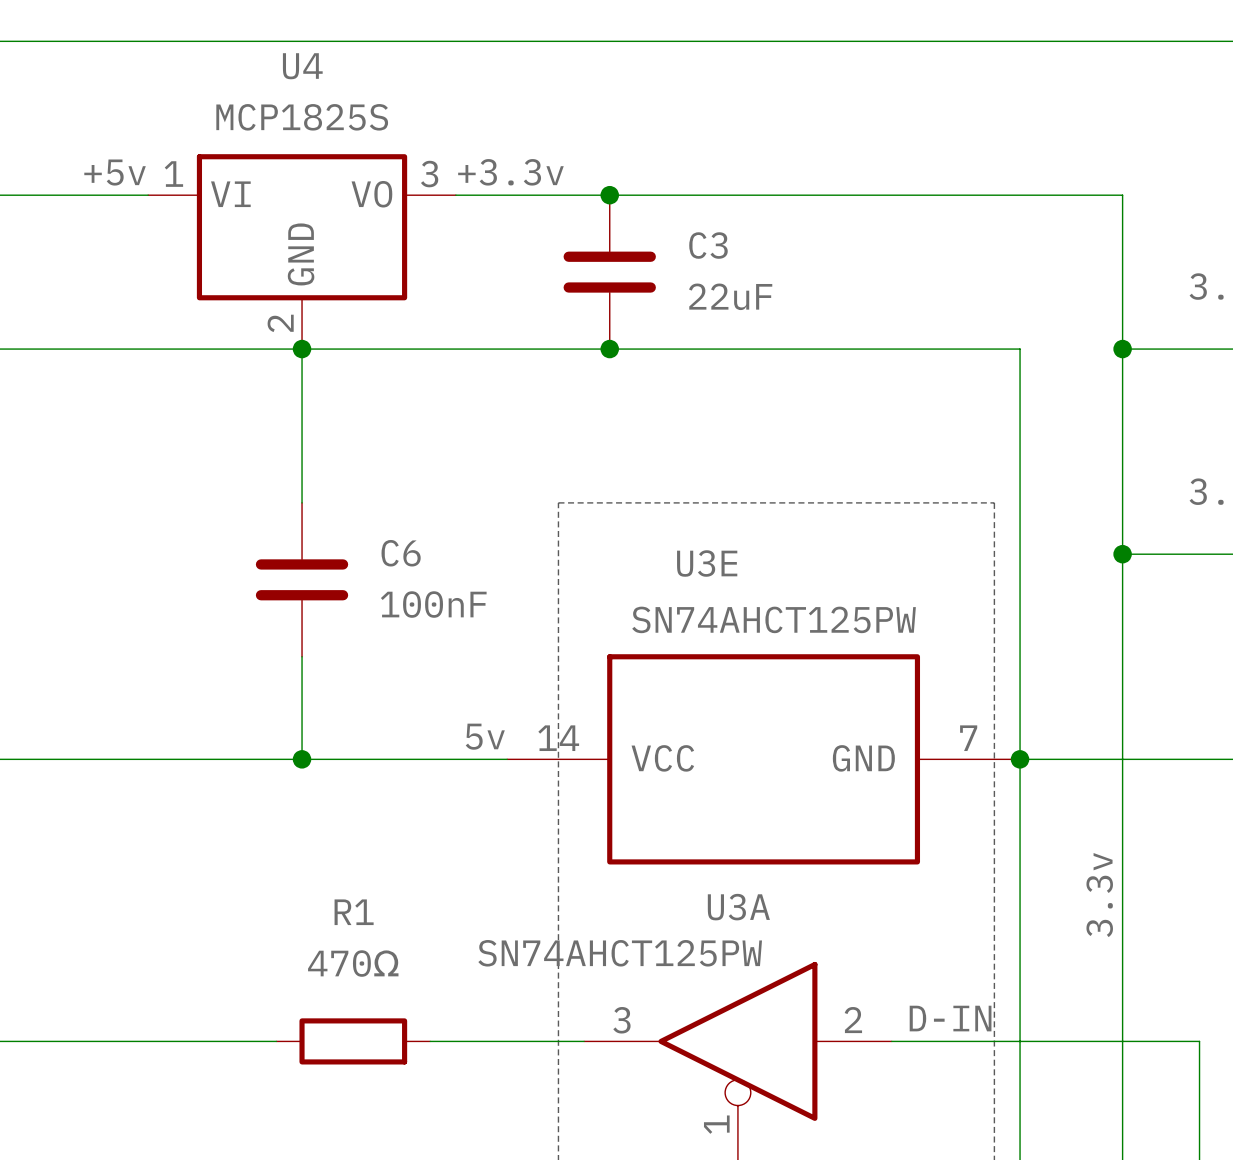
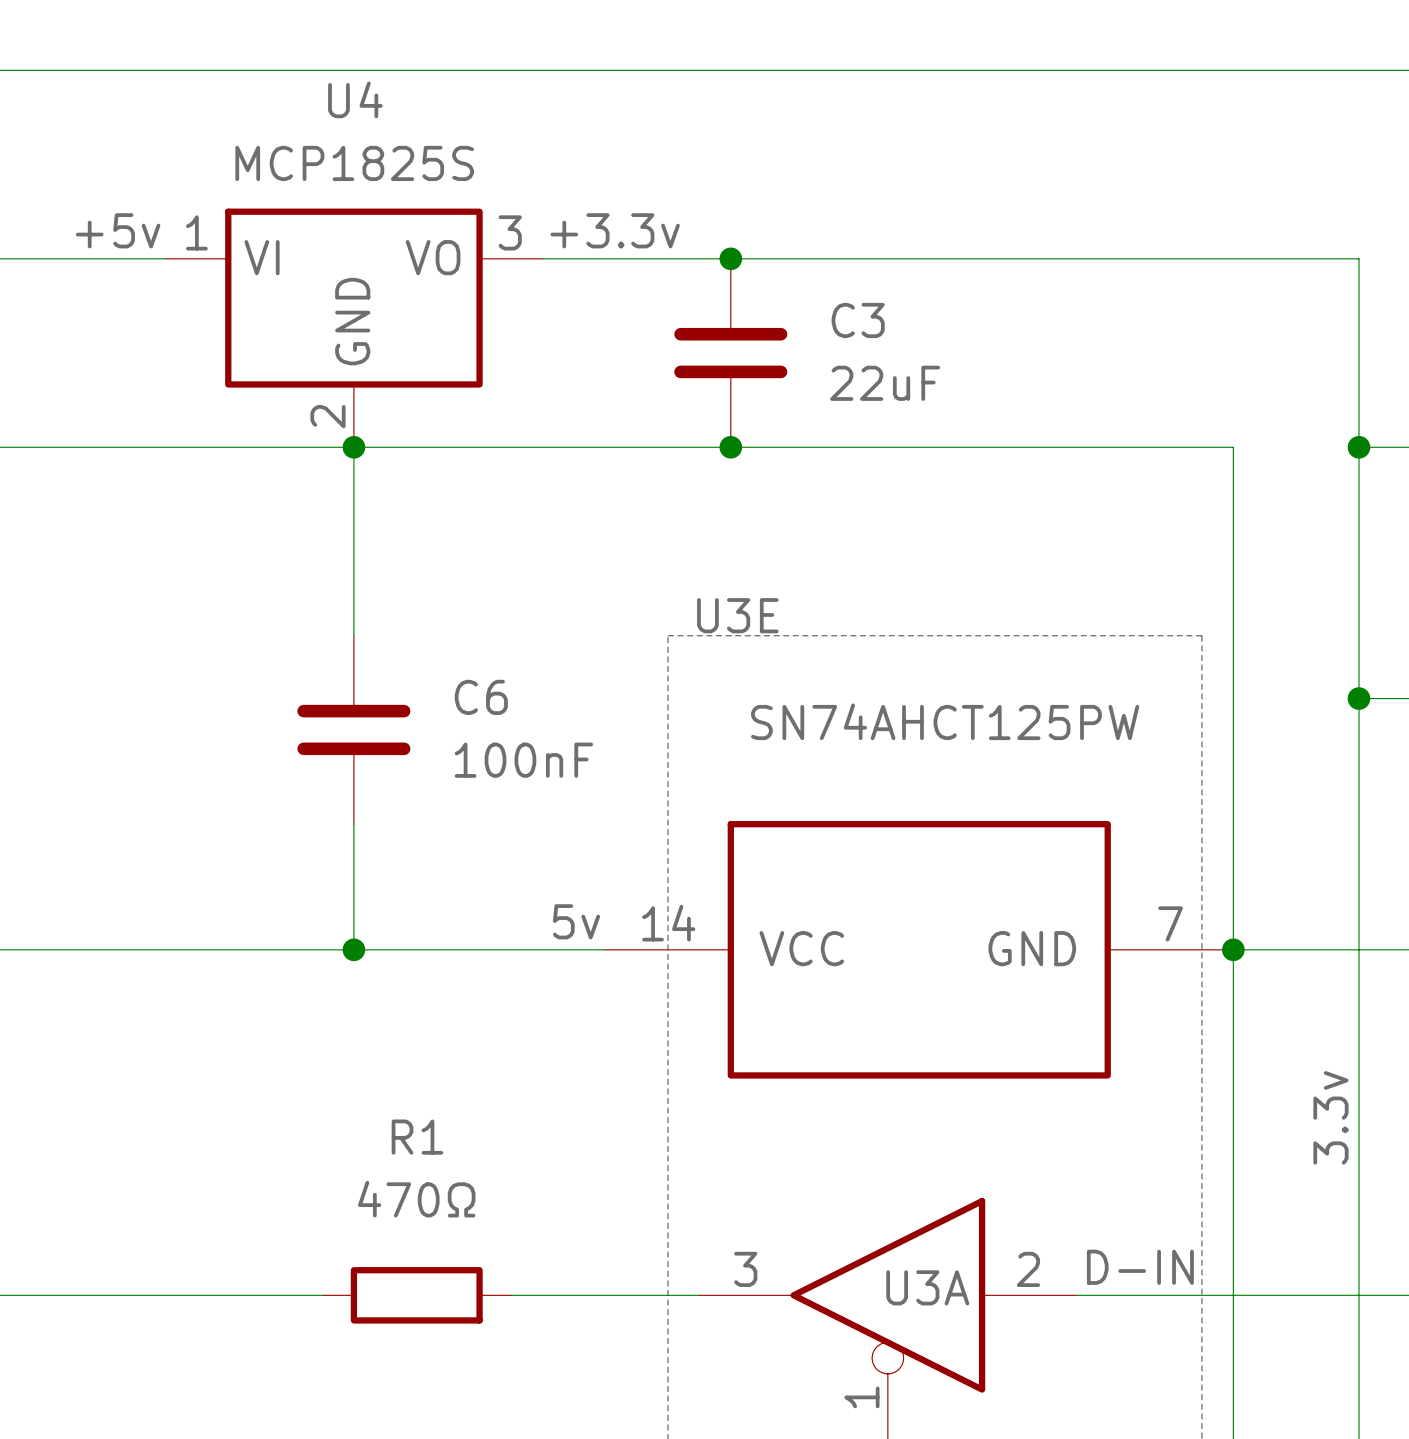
U3E name position: U3E (707, 563) -> U3E (737, 615)
U3E value position: SN74AHCT125PW (774, 619) -> SN74AHCT125PW (945, 721)
U3A name position: U3A (738, 907) -> U3A (927, 1287)
U3A value: SN74AHCT125PW (620, 953) -> none

